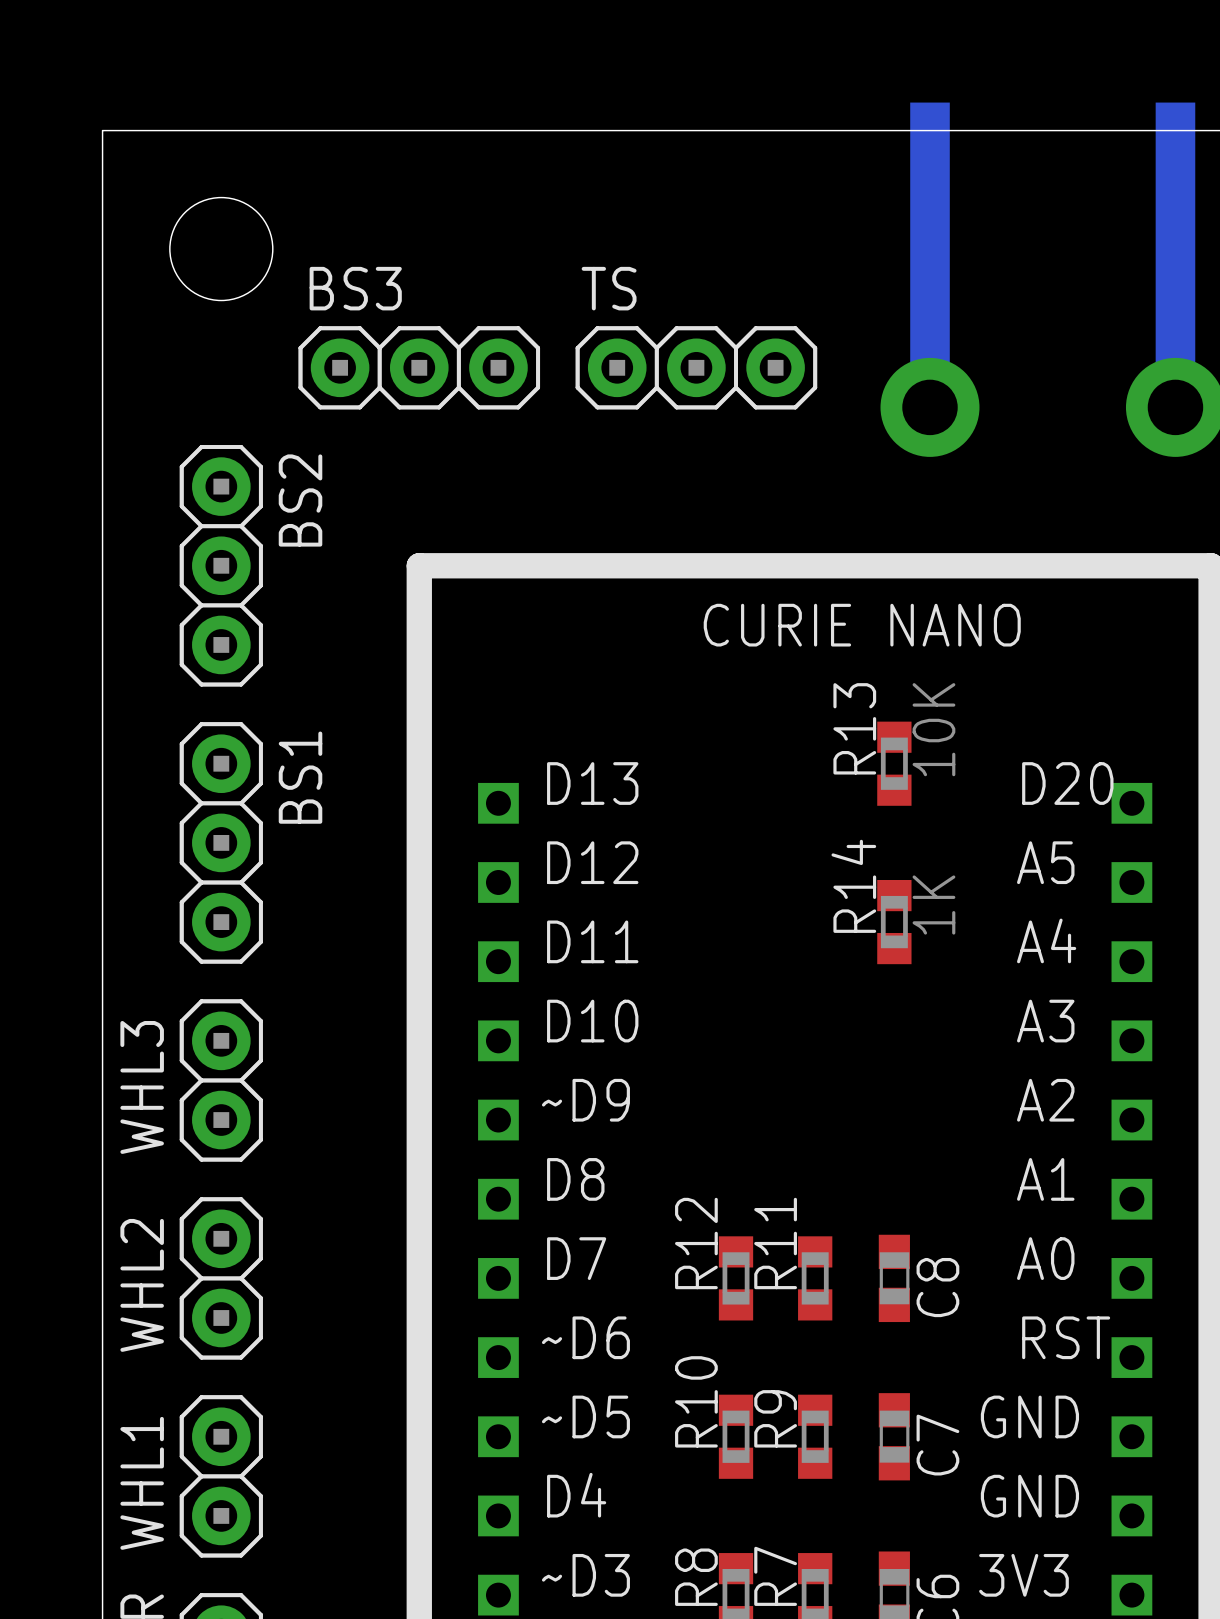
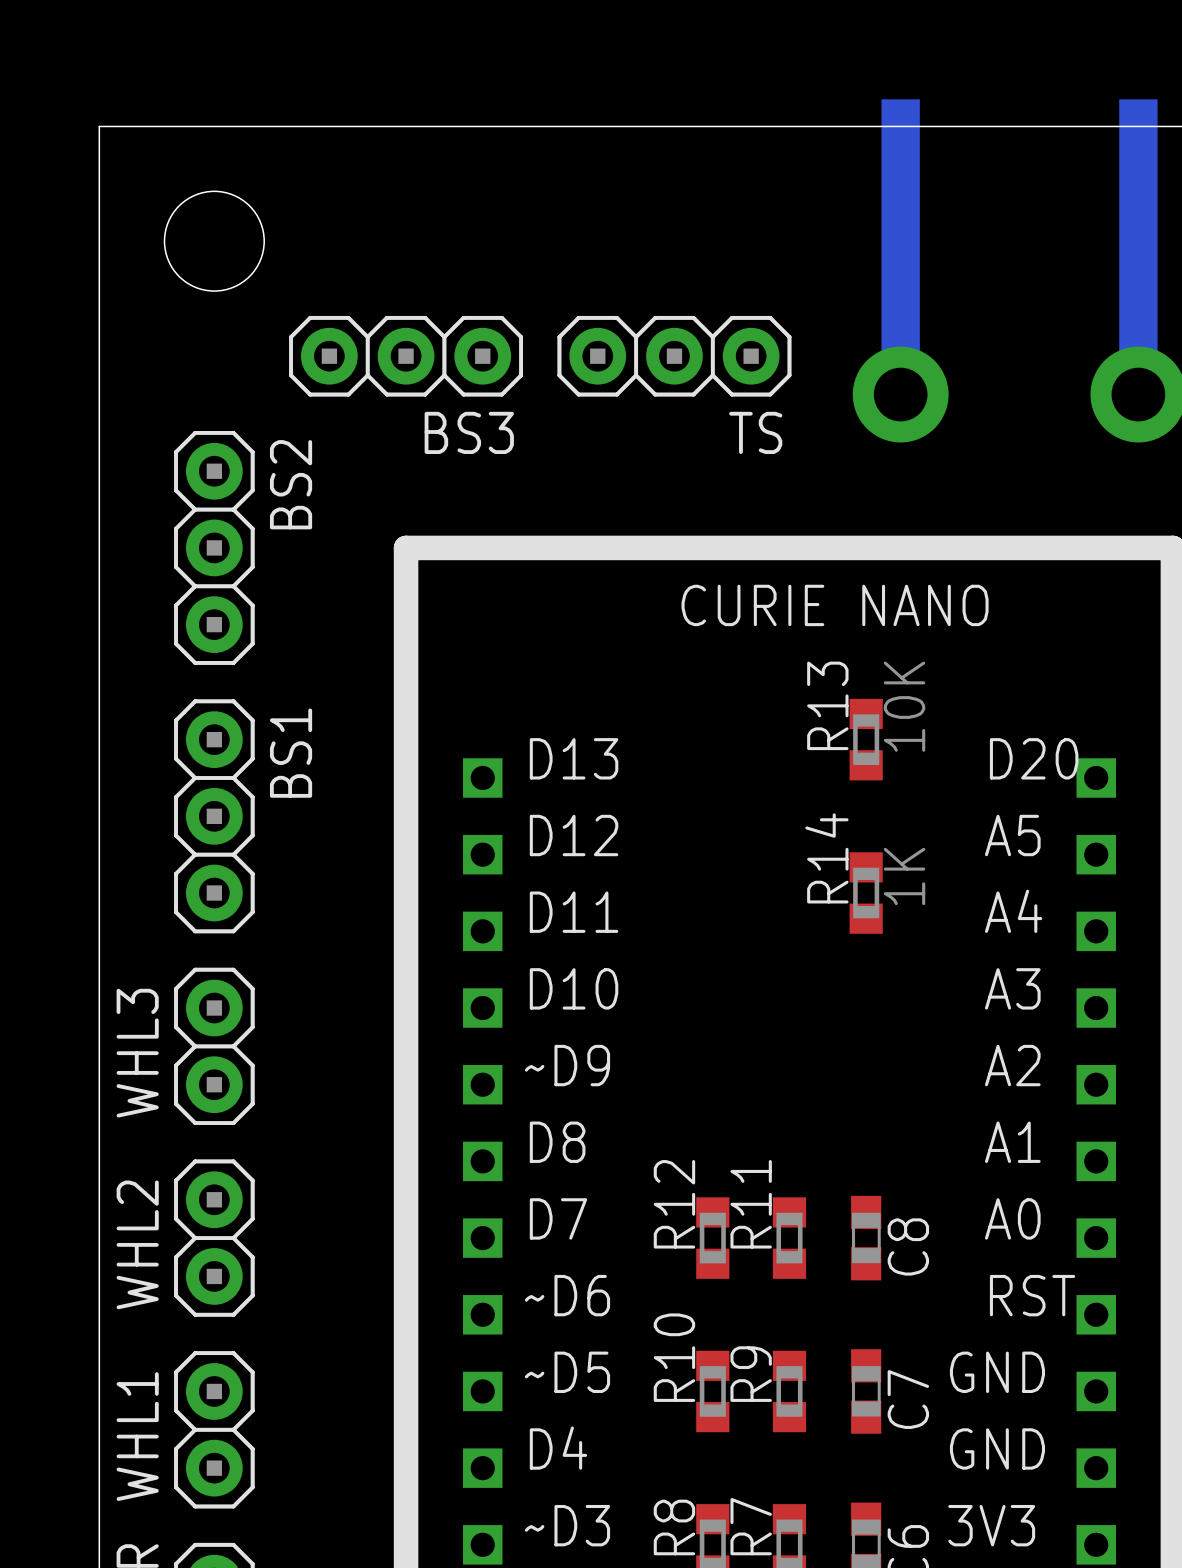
BS3 name position: BS3 (355, 288) -> BS3 (469, 432)
TS name position: TS (609, 288) -> TS (755, 432)

